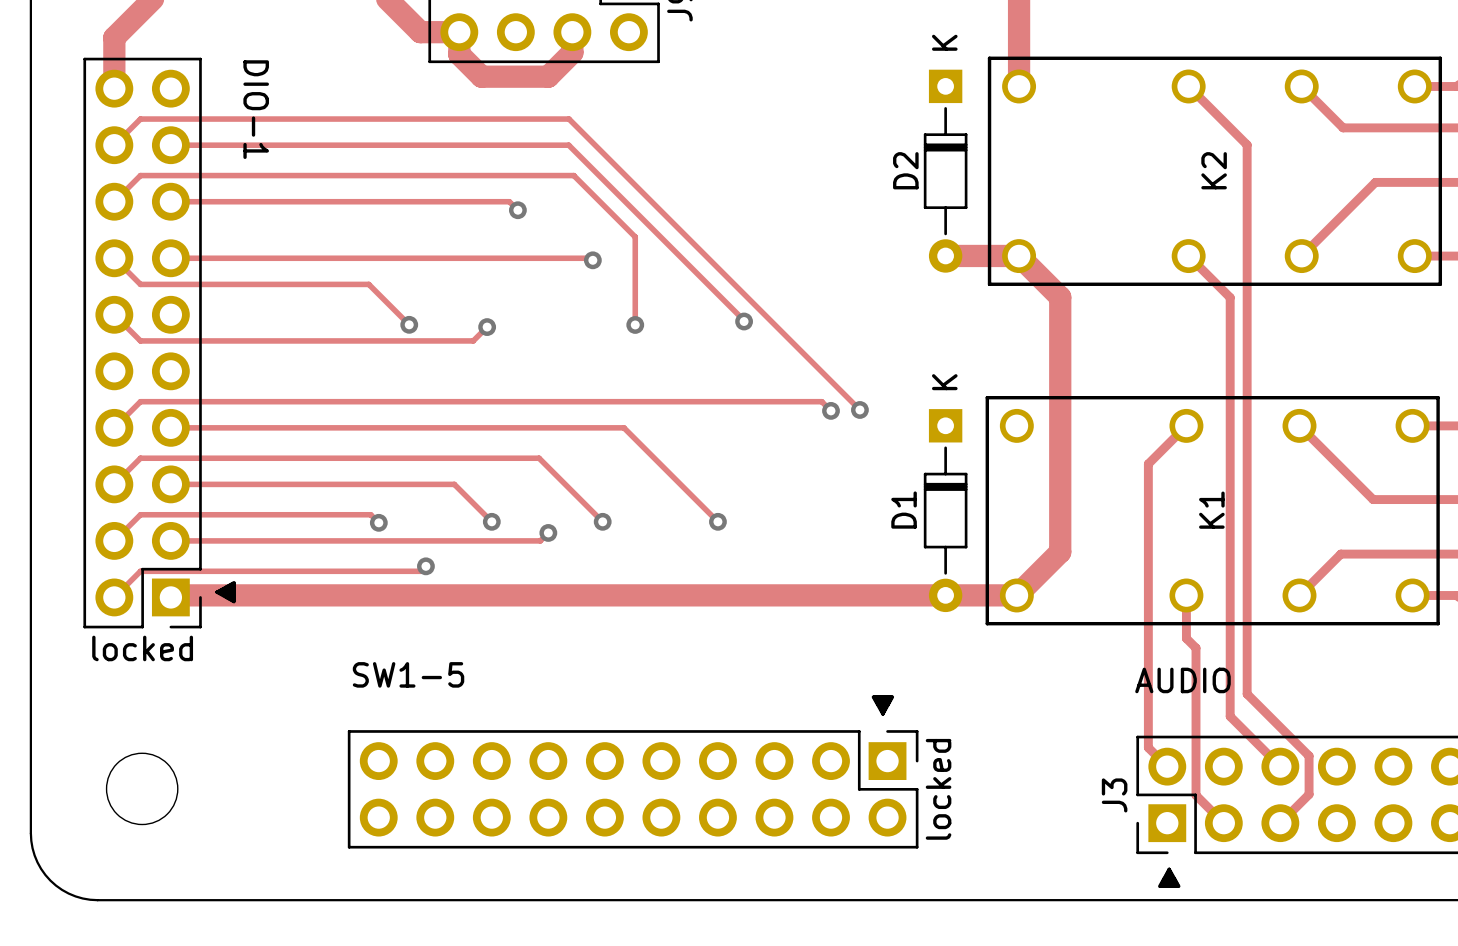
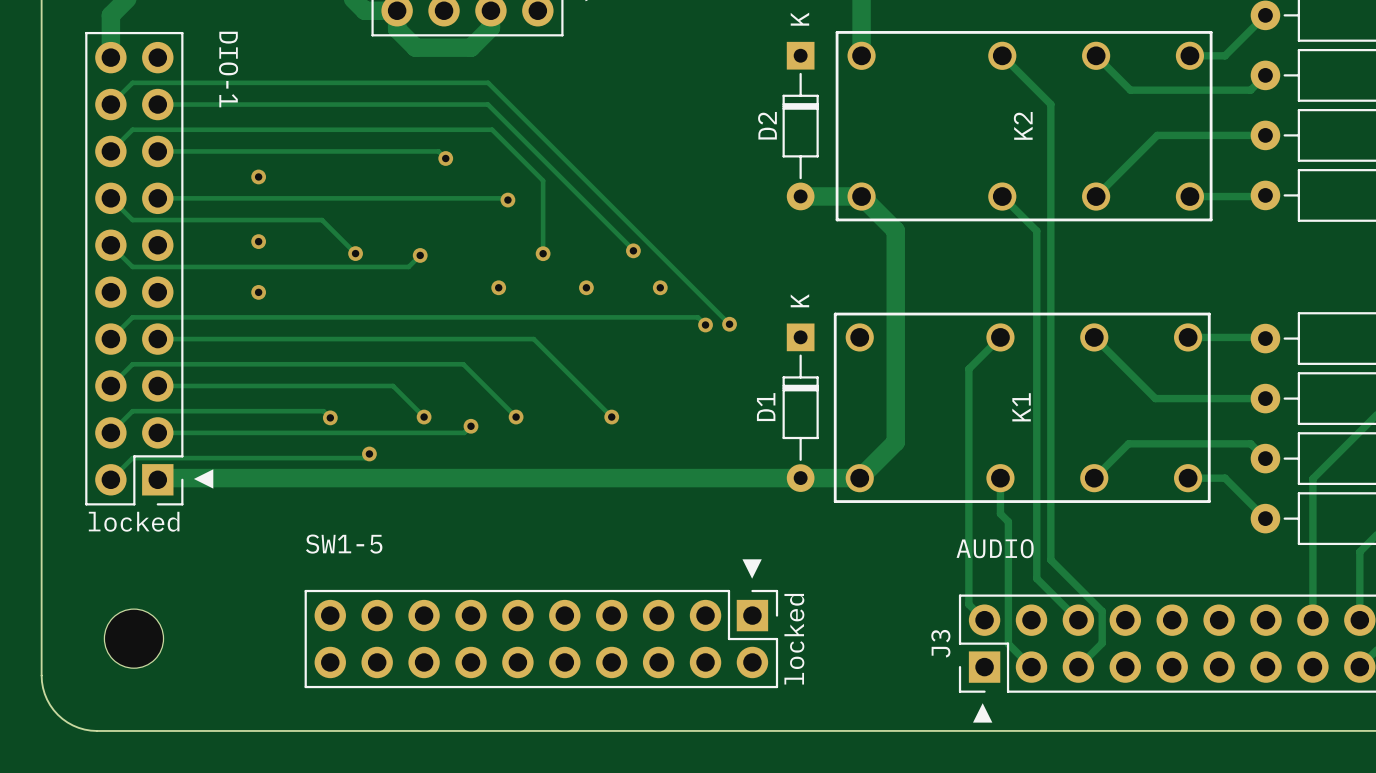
via: none -> (258, 176)
via: none -> (258, 241)
via: none -> (498, 287)
via: none -> (586, 287)
via: none -> (660, 287)
via: none -> (258, 292)

